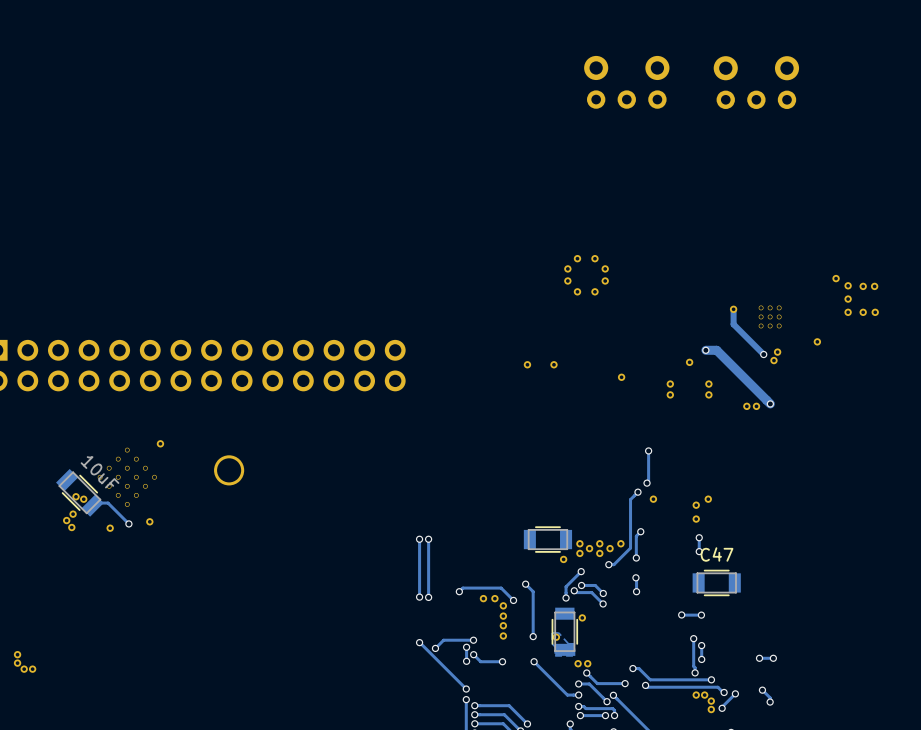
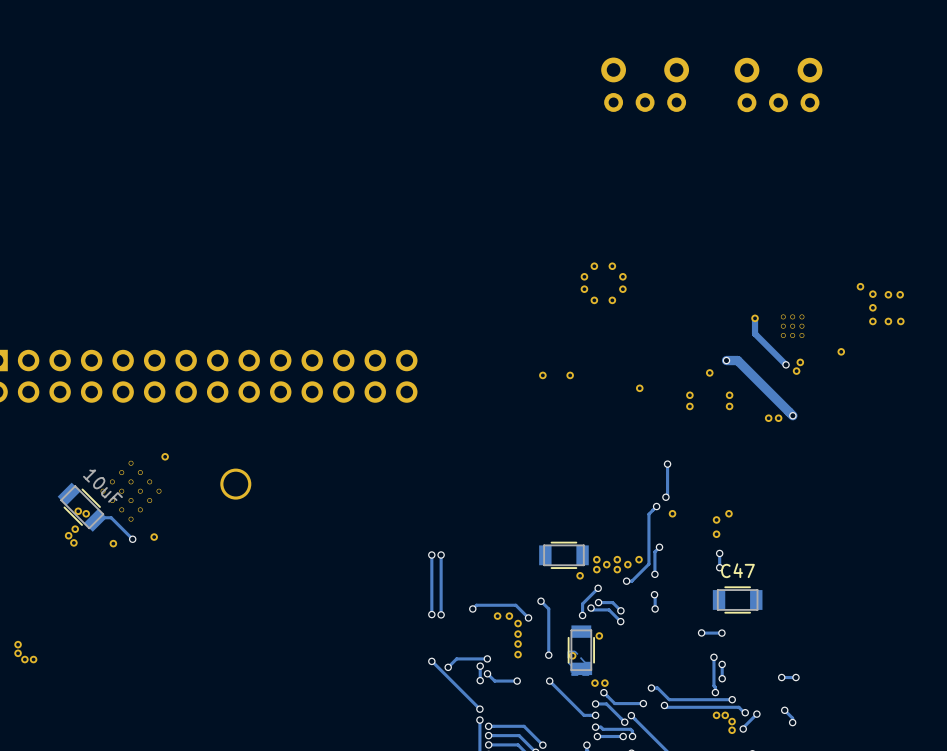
part: none -> (18, 644)
part: none -> (18, 653)
part: none -> (24, 659)
part: none -> (33, 659)
part: (17, 654) -> none
part: (17, 663) -> none
part: (24, 669) -> none
part: (32, 669) -> none

